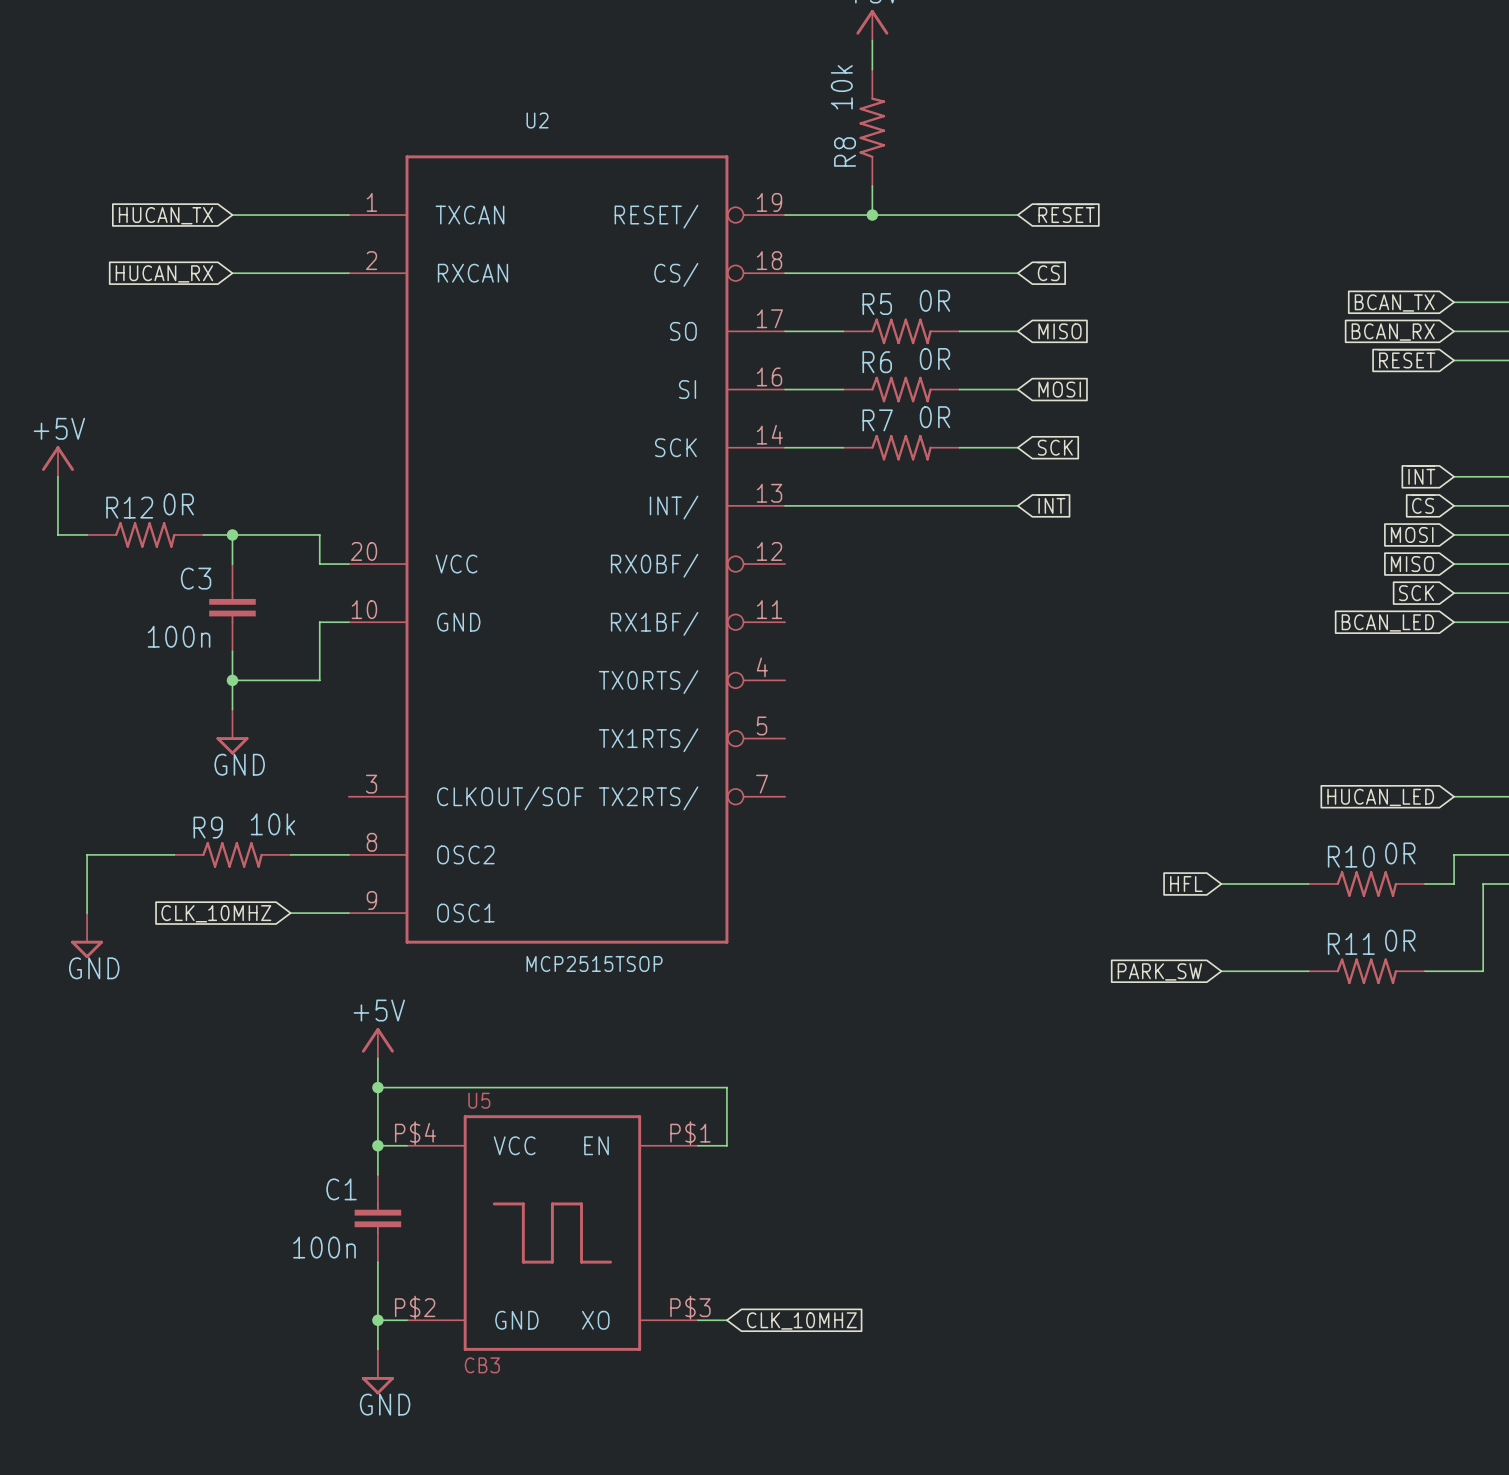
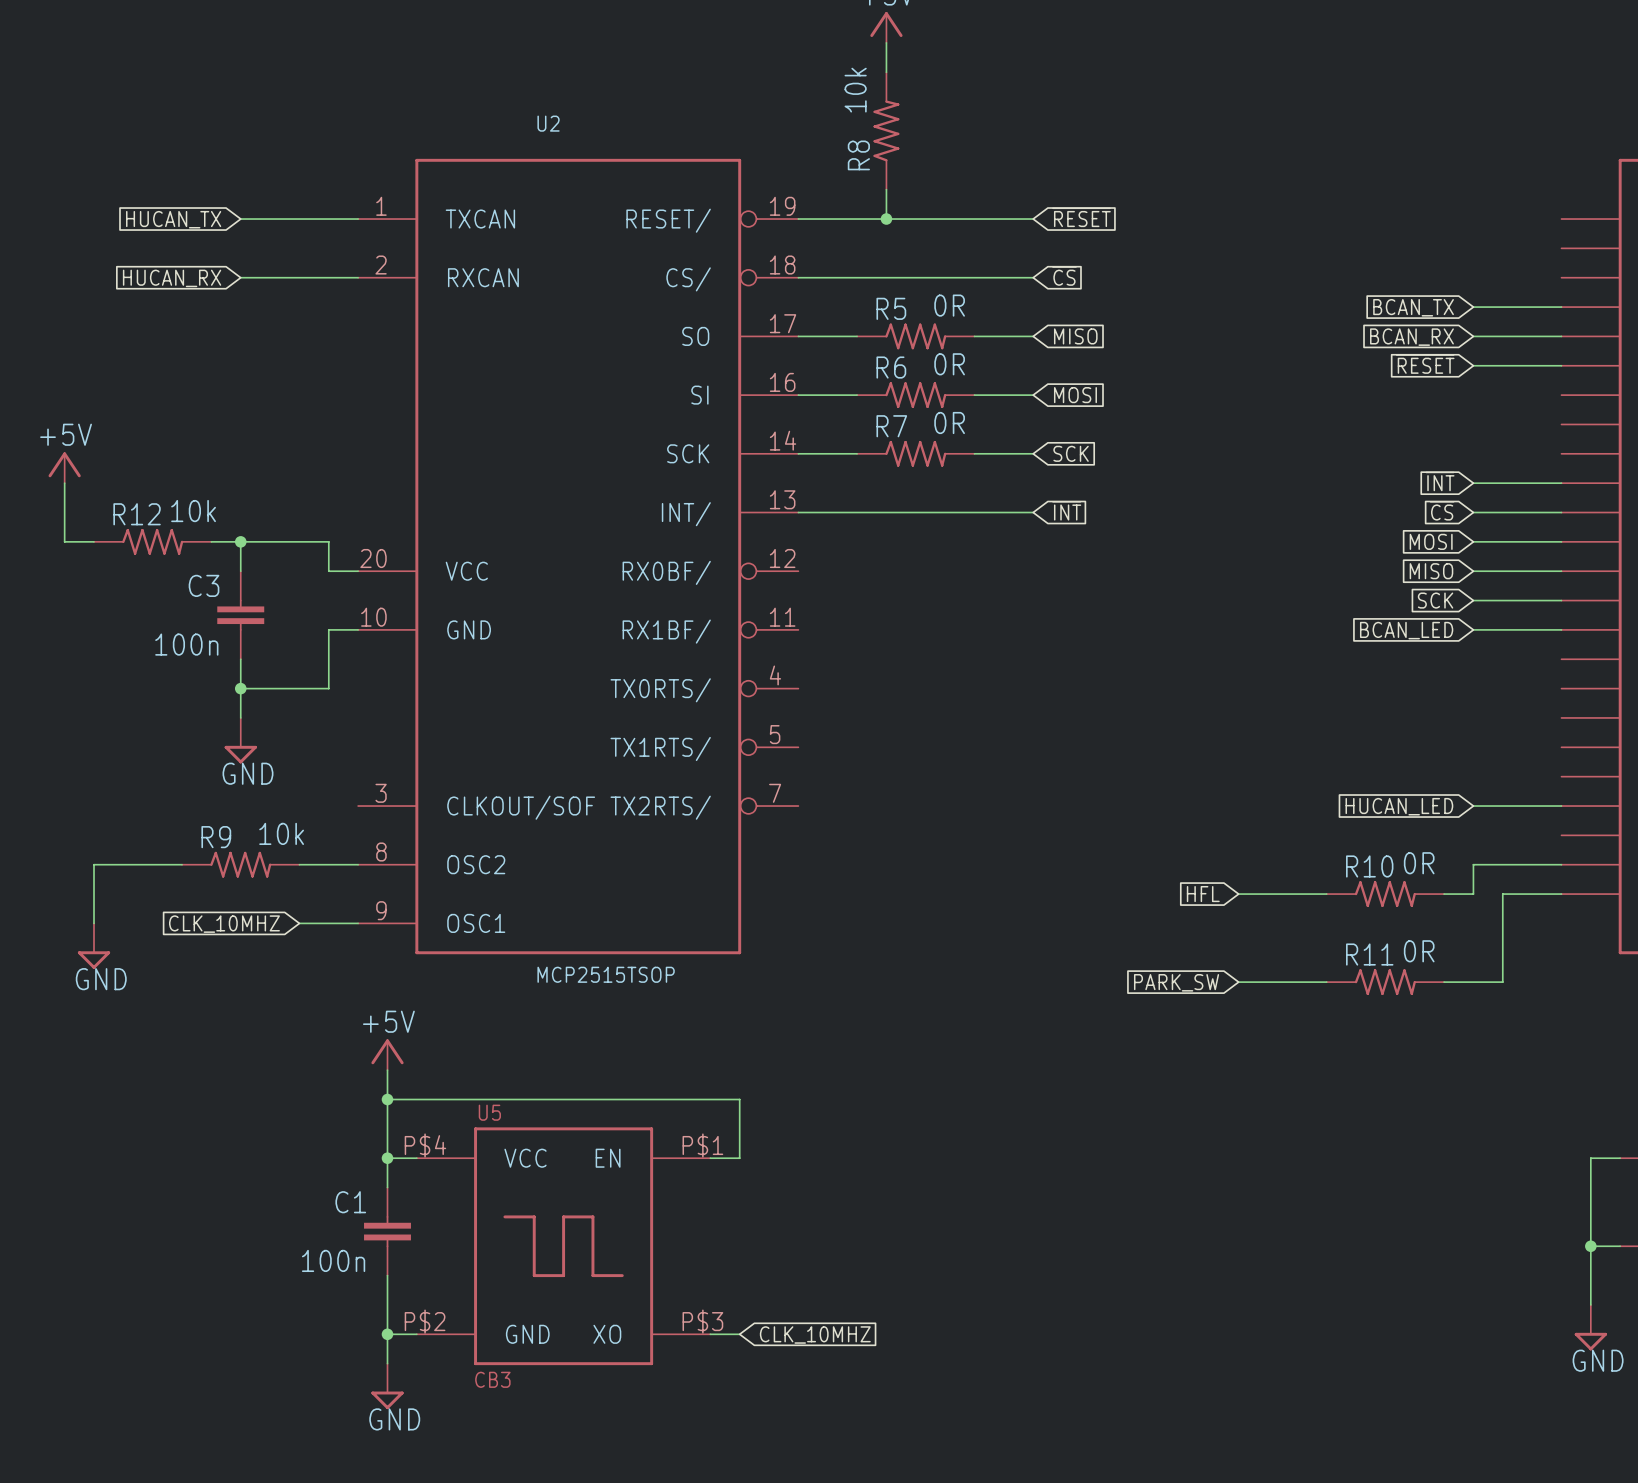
R12 value: 0R (178, 504) -> 10k (193, 511)

